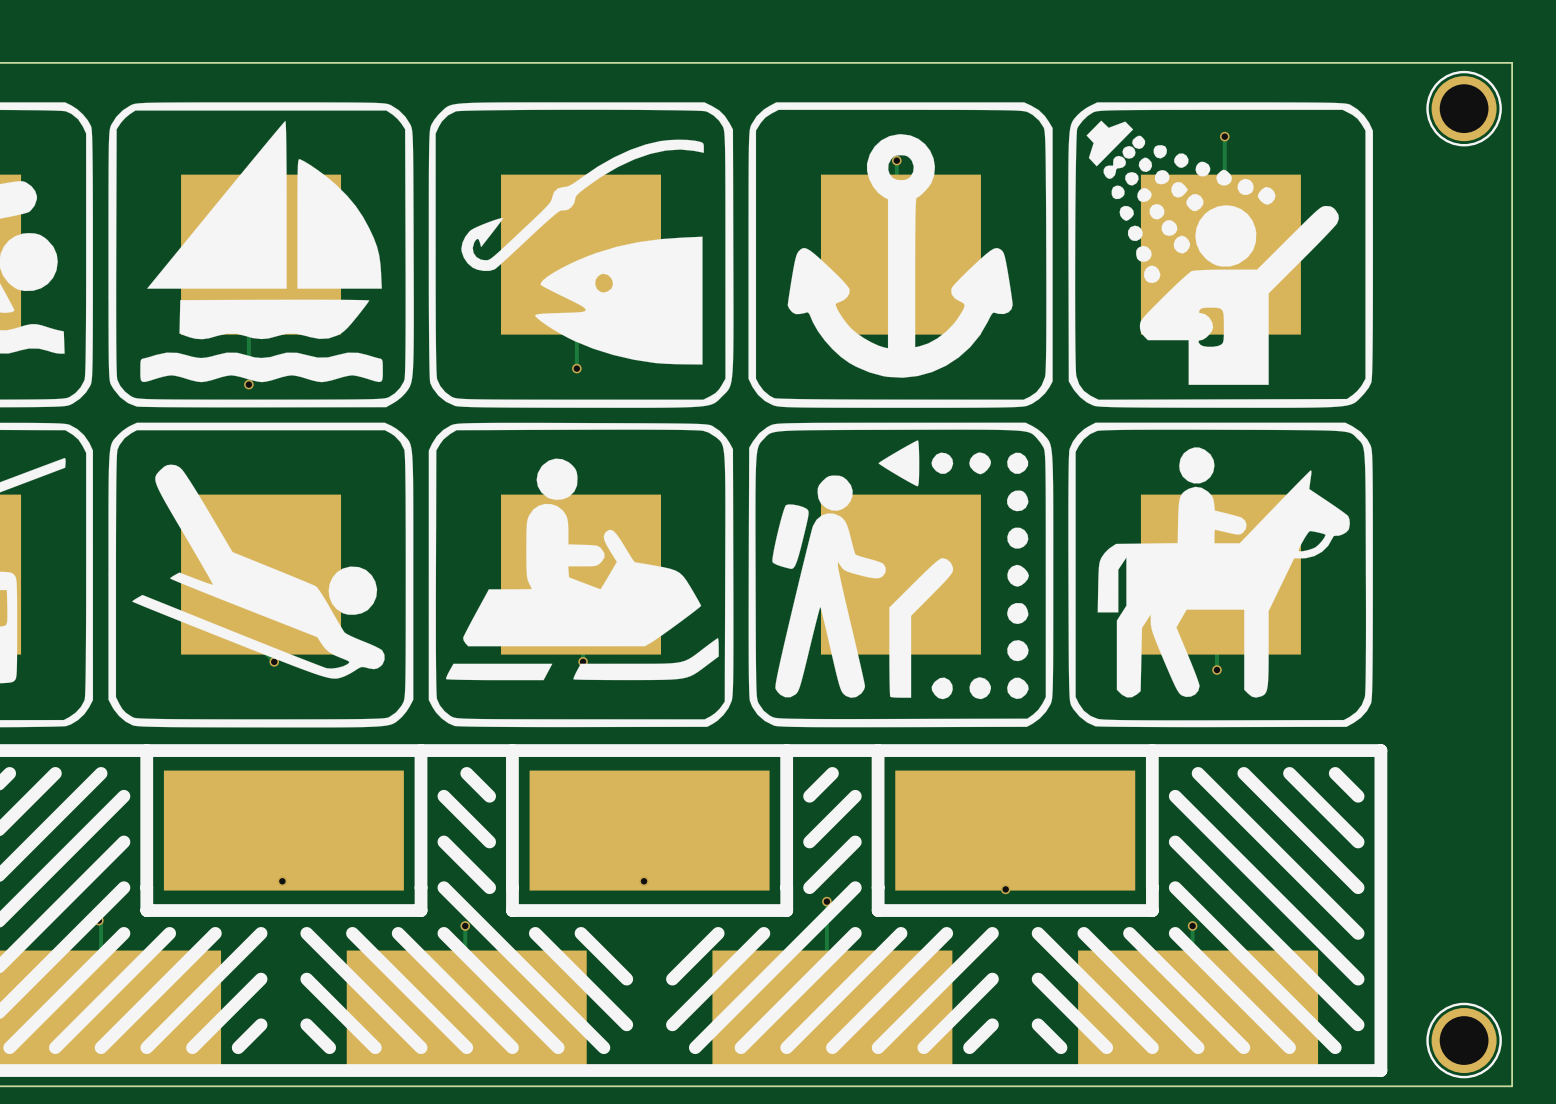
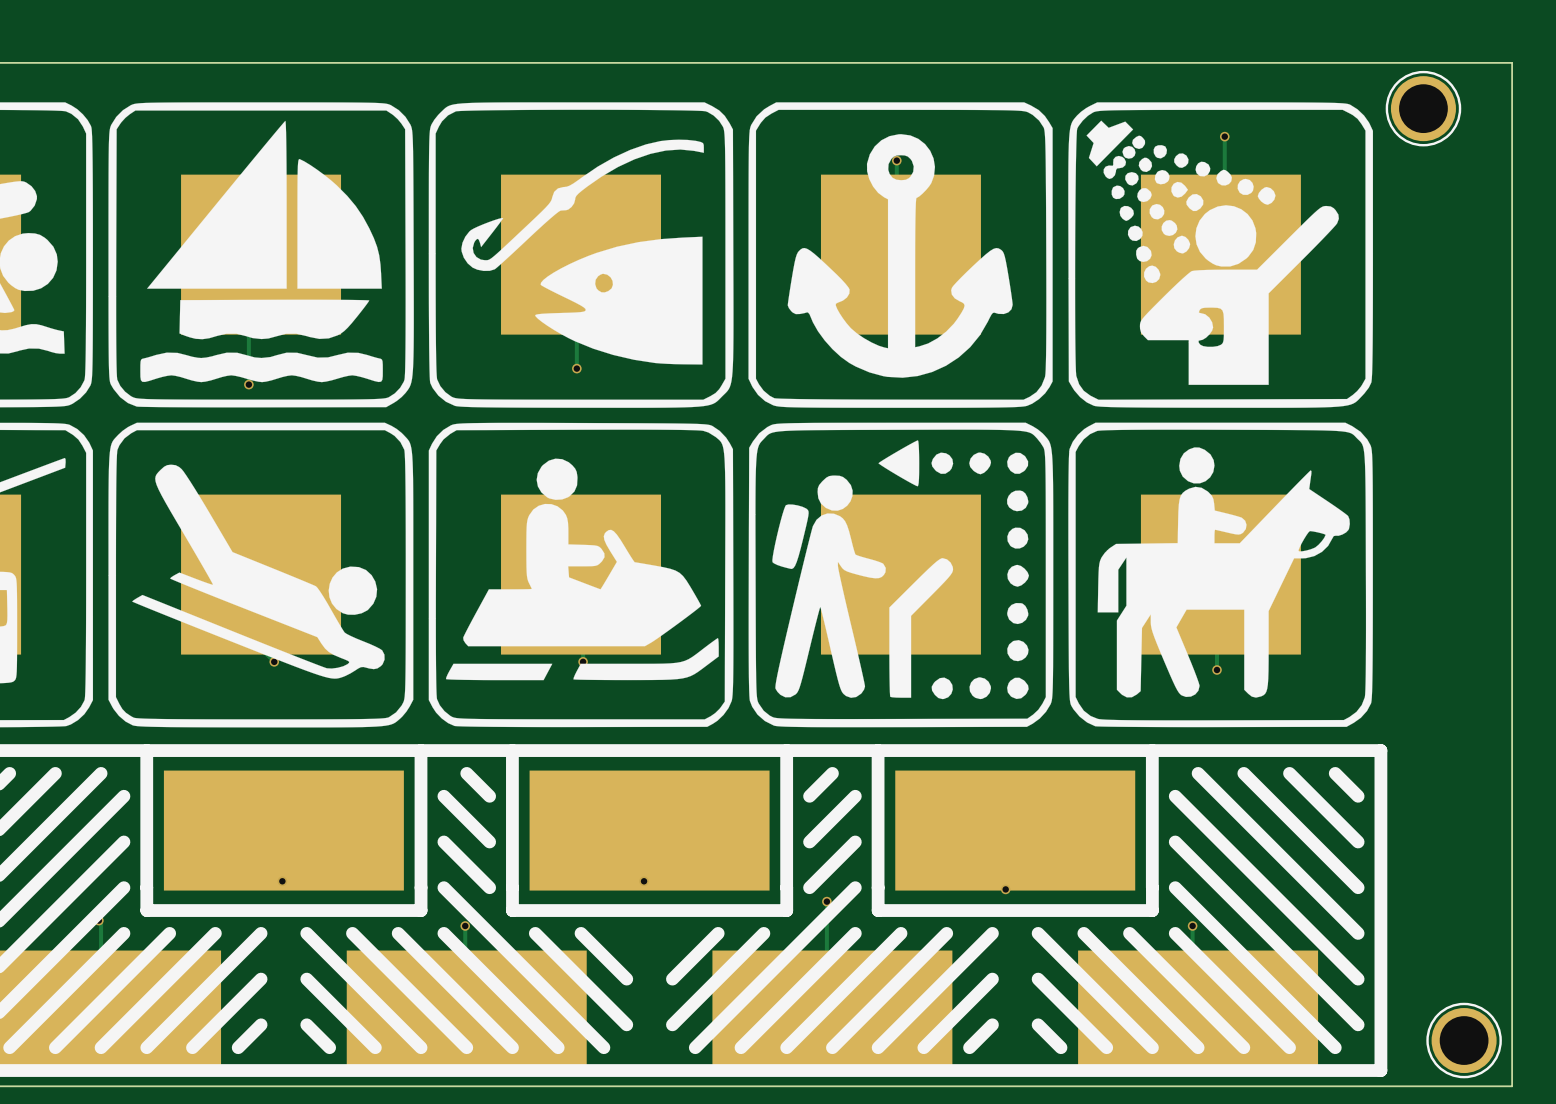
part position: (1464, 108) -> (1423, 108)

